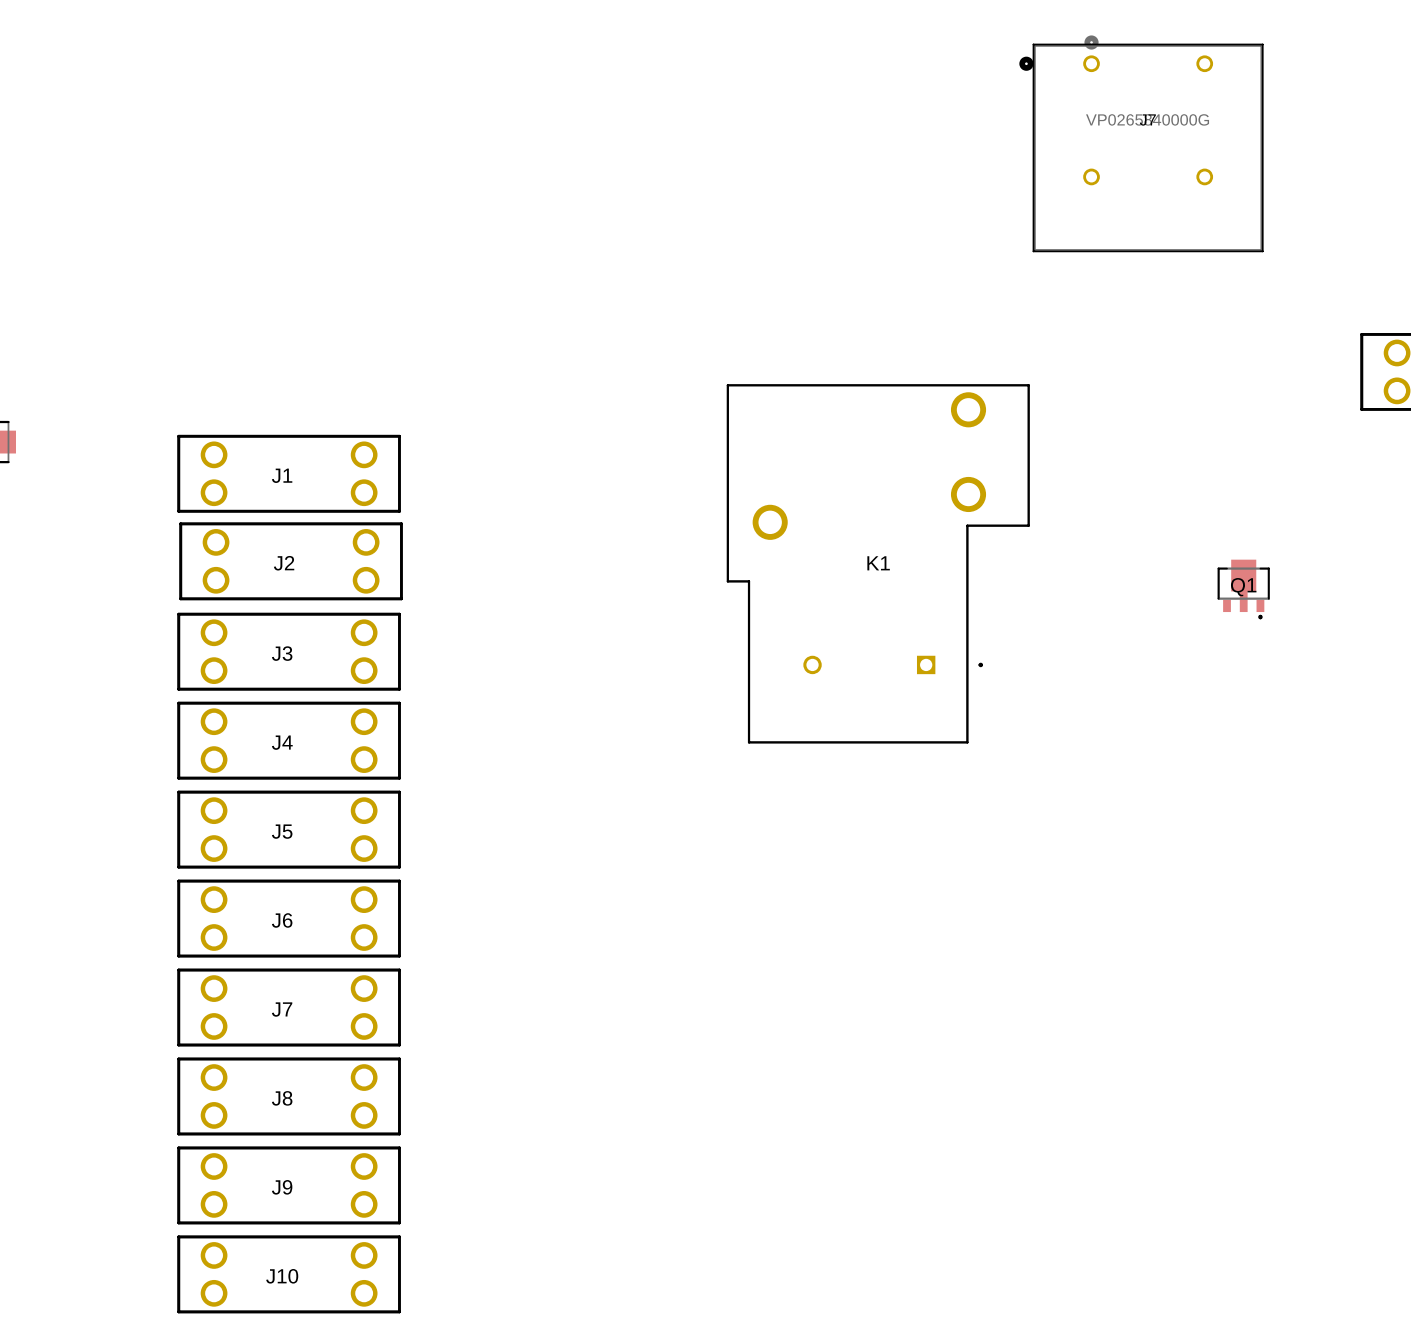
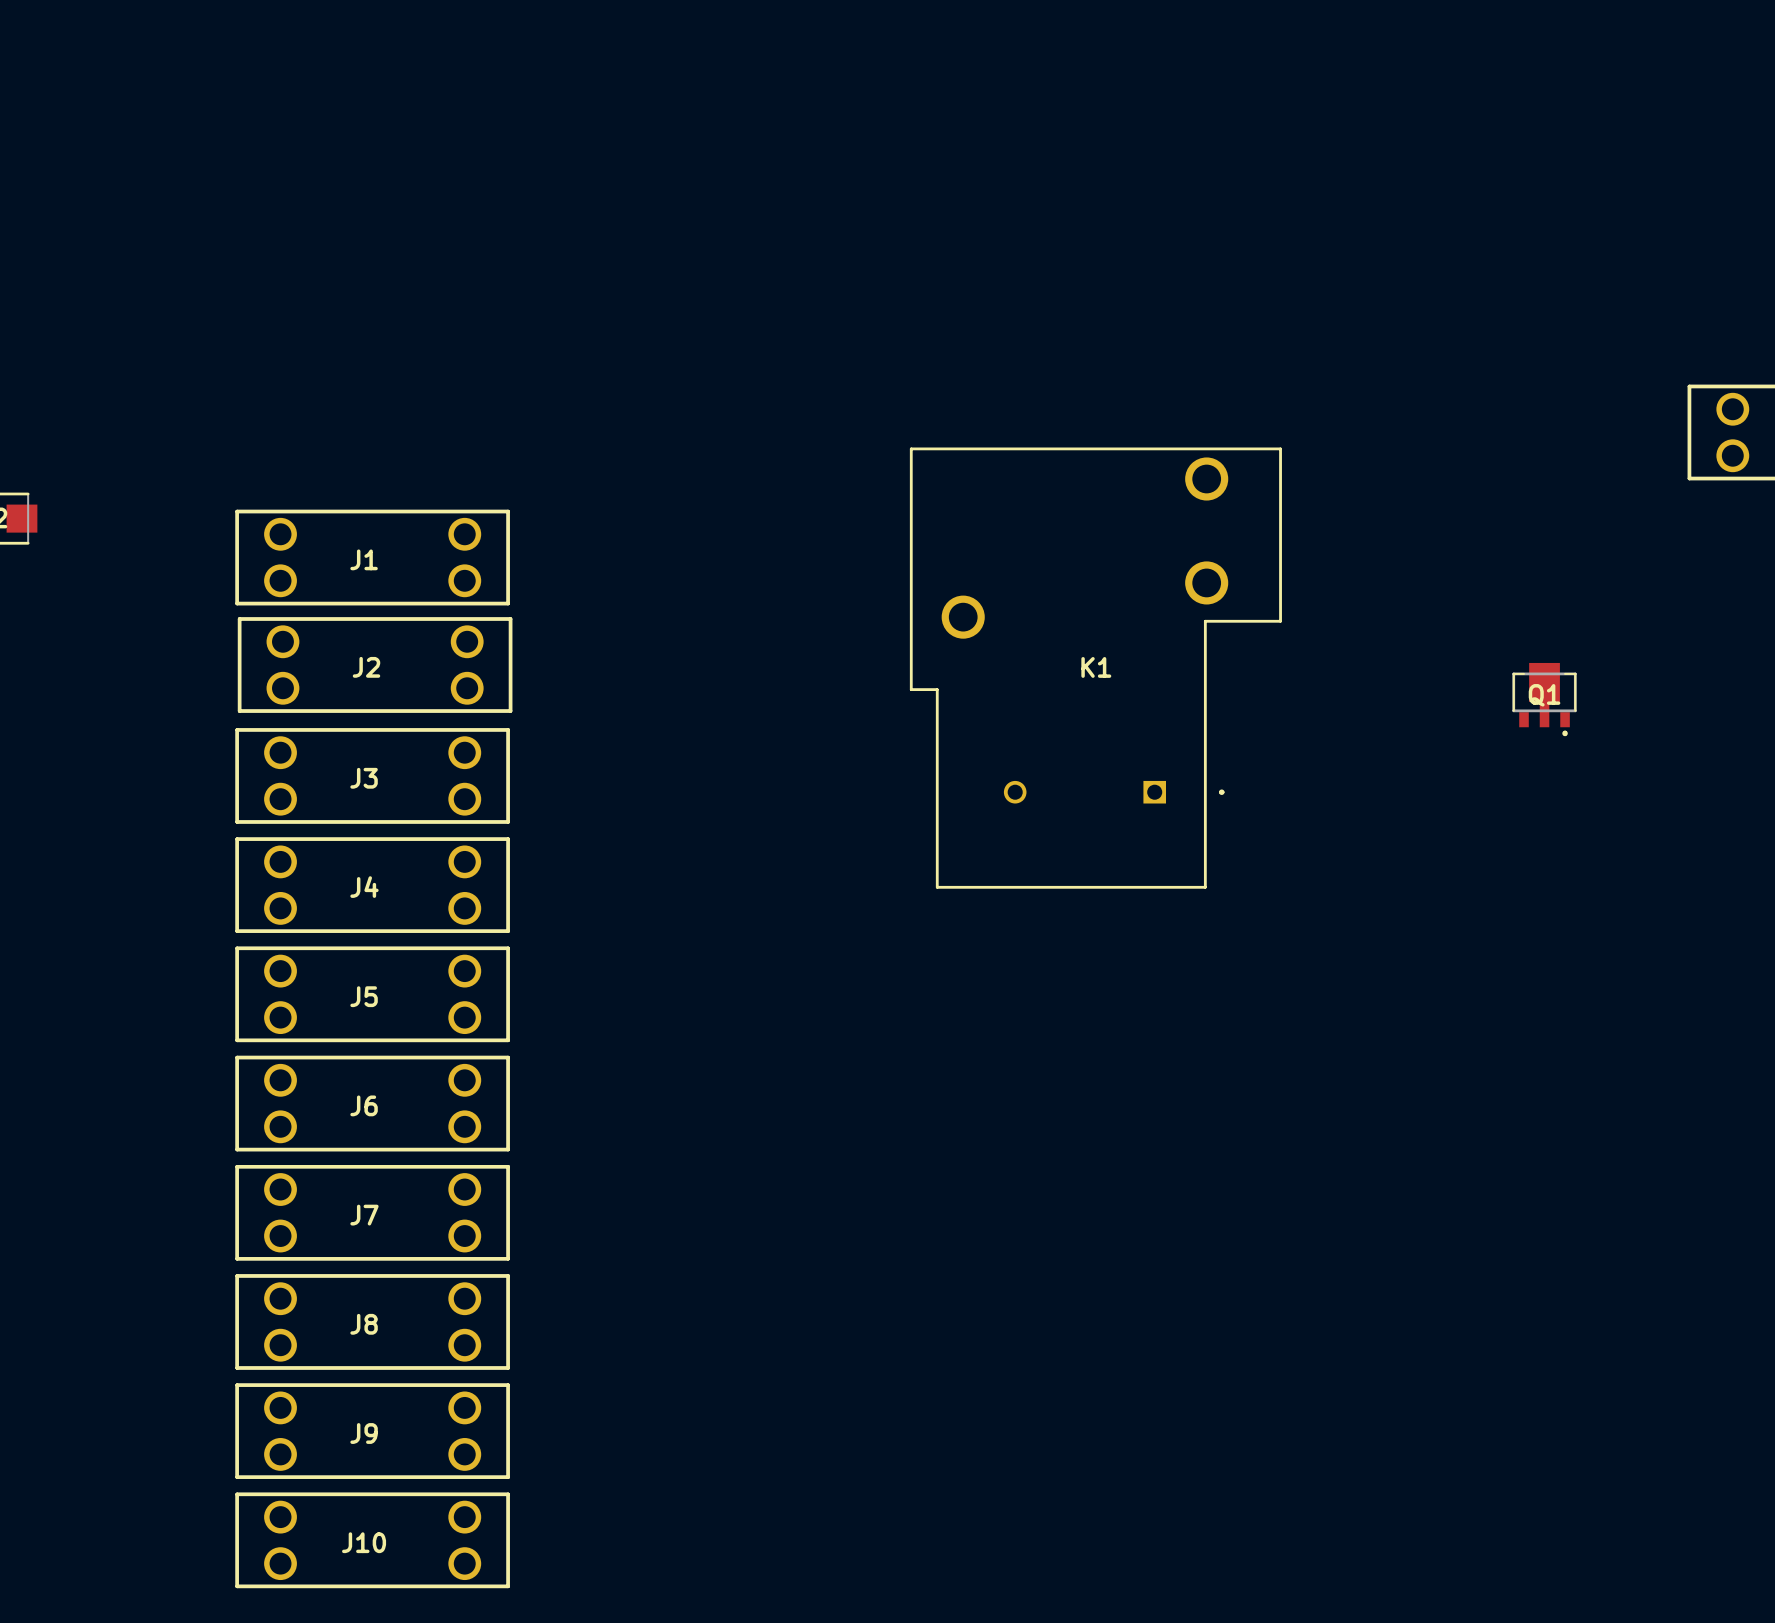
J7: VP0265840000G (1141, 143) -> none

